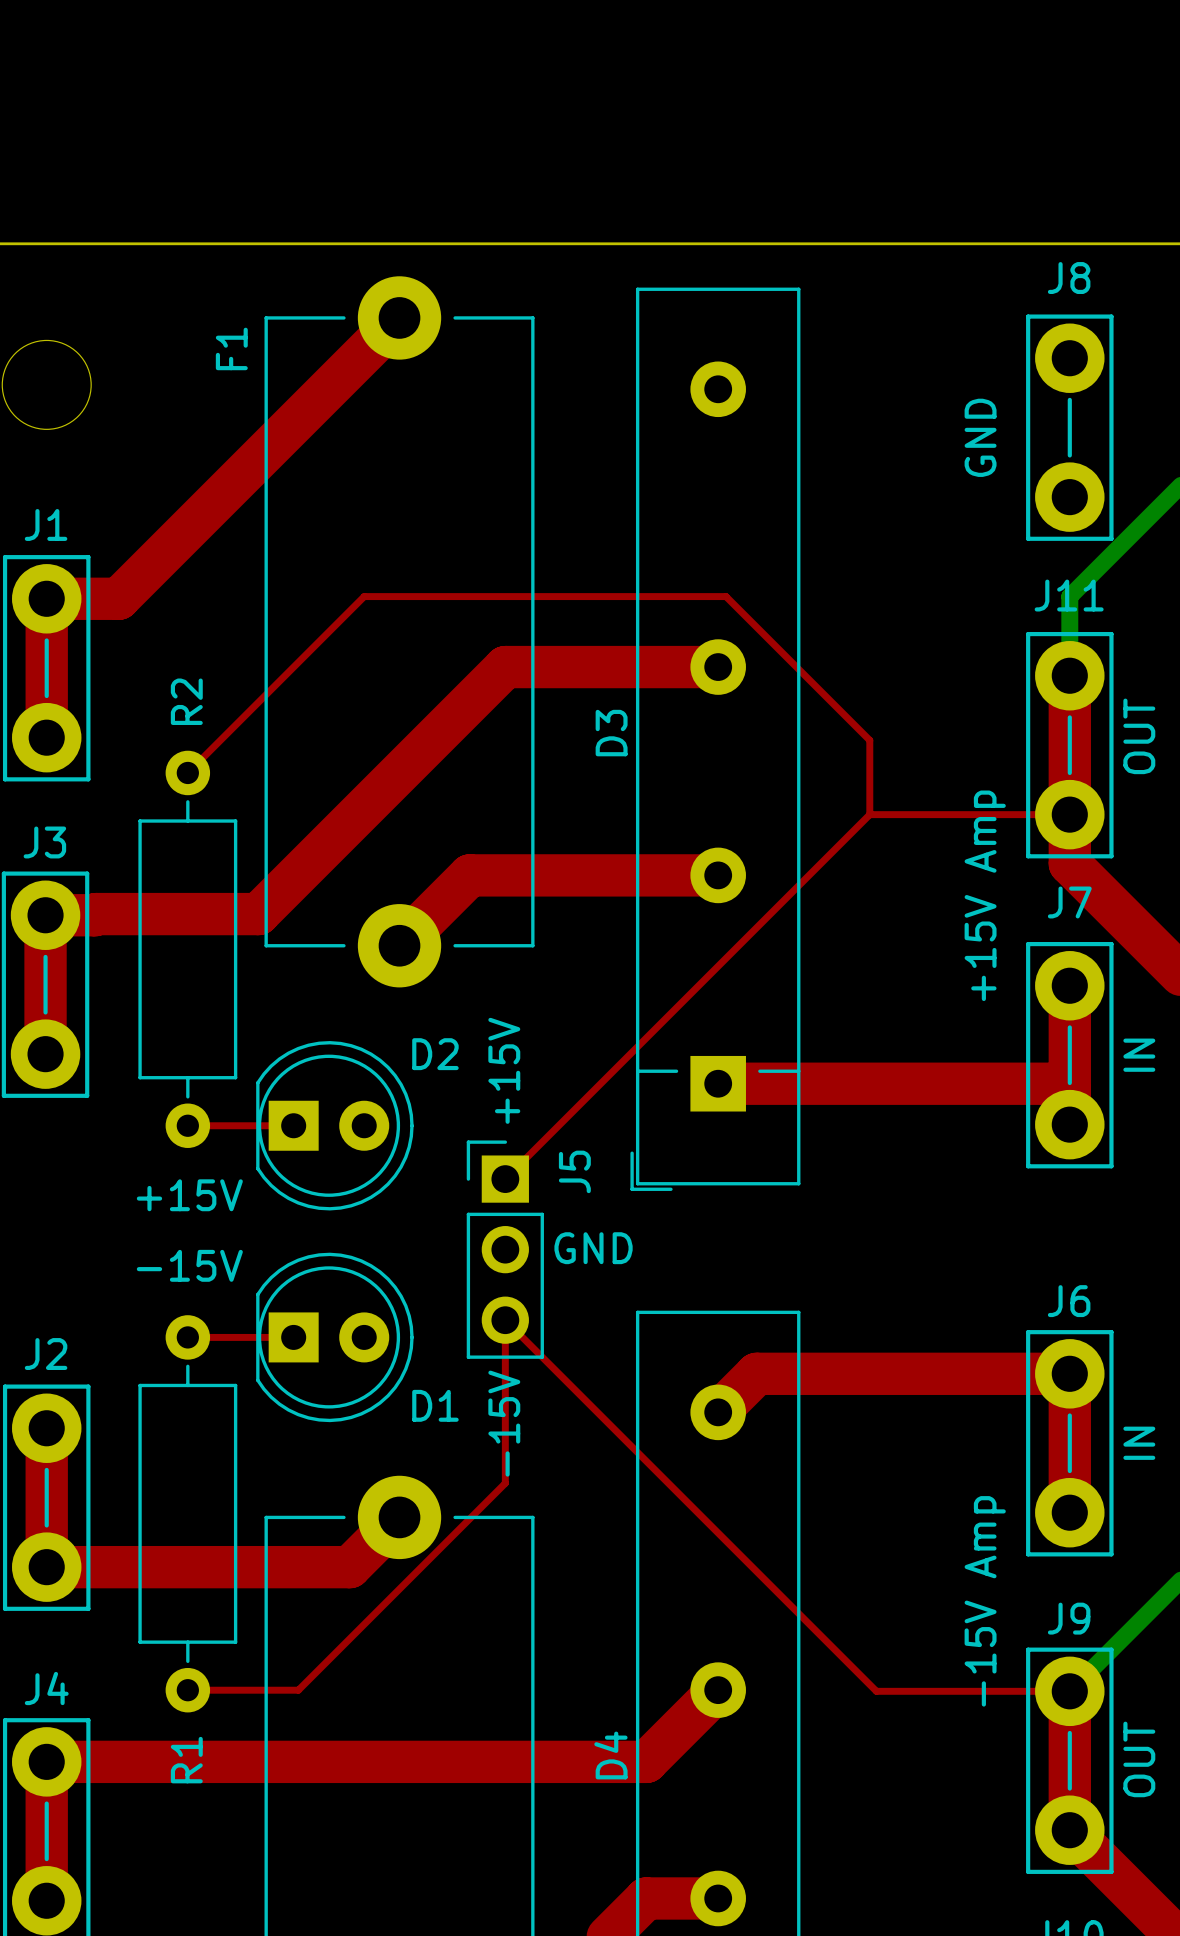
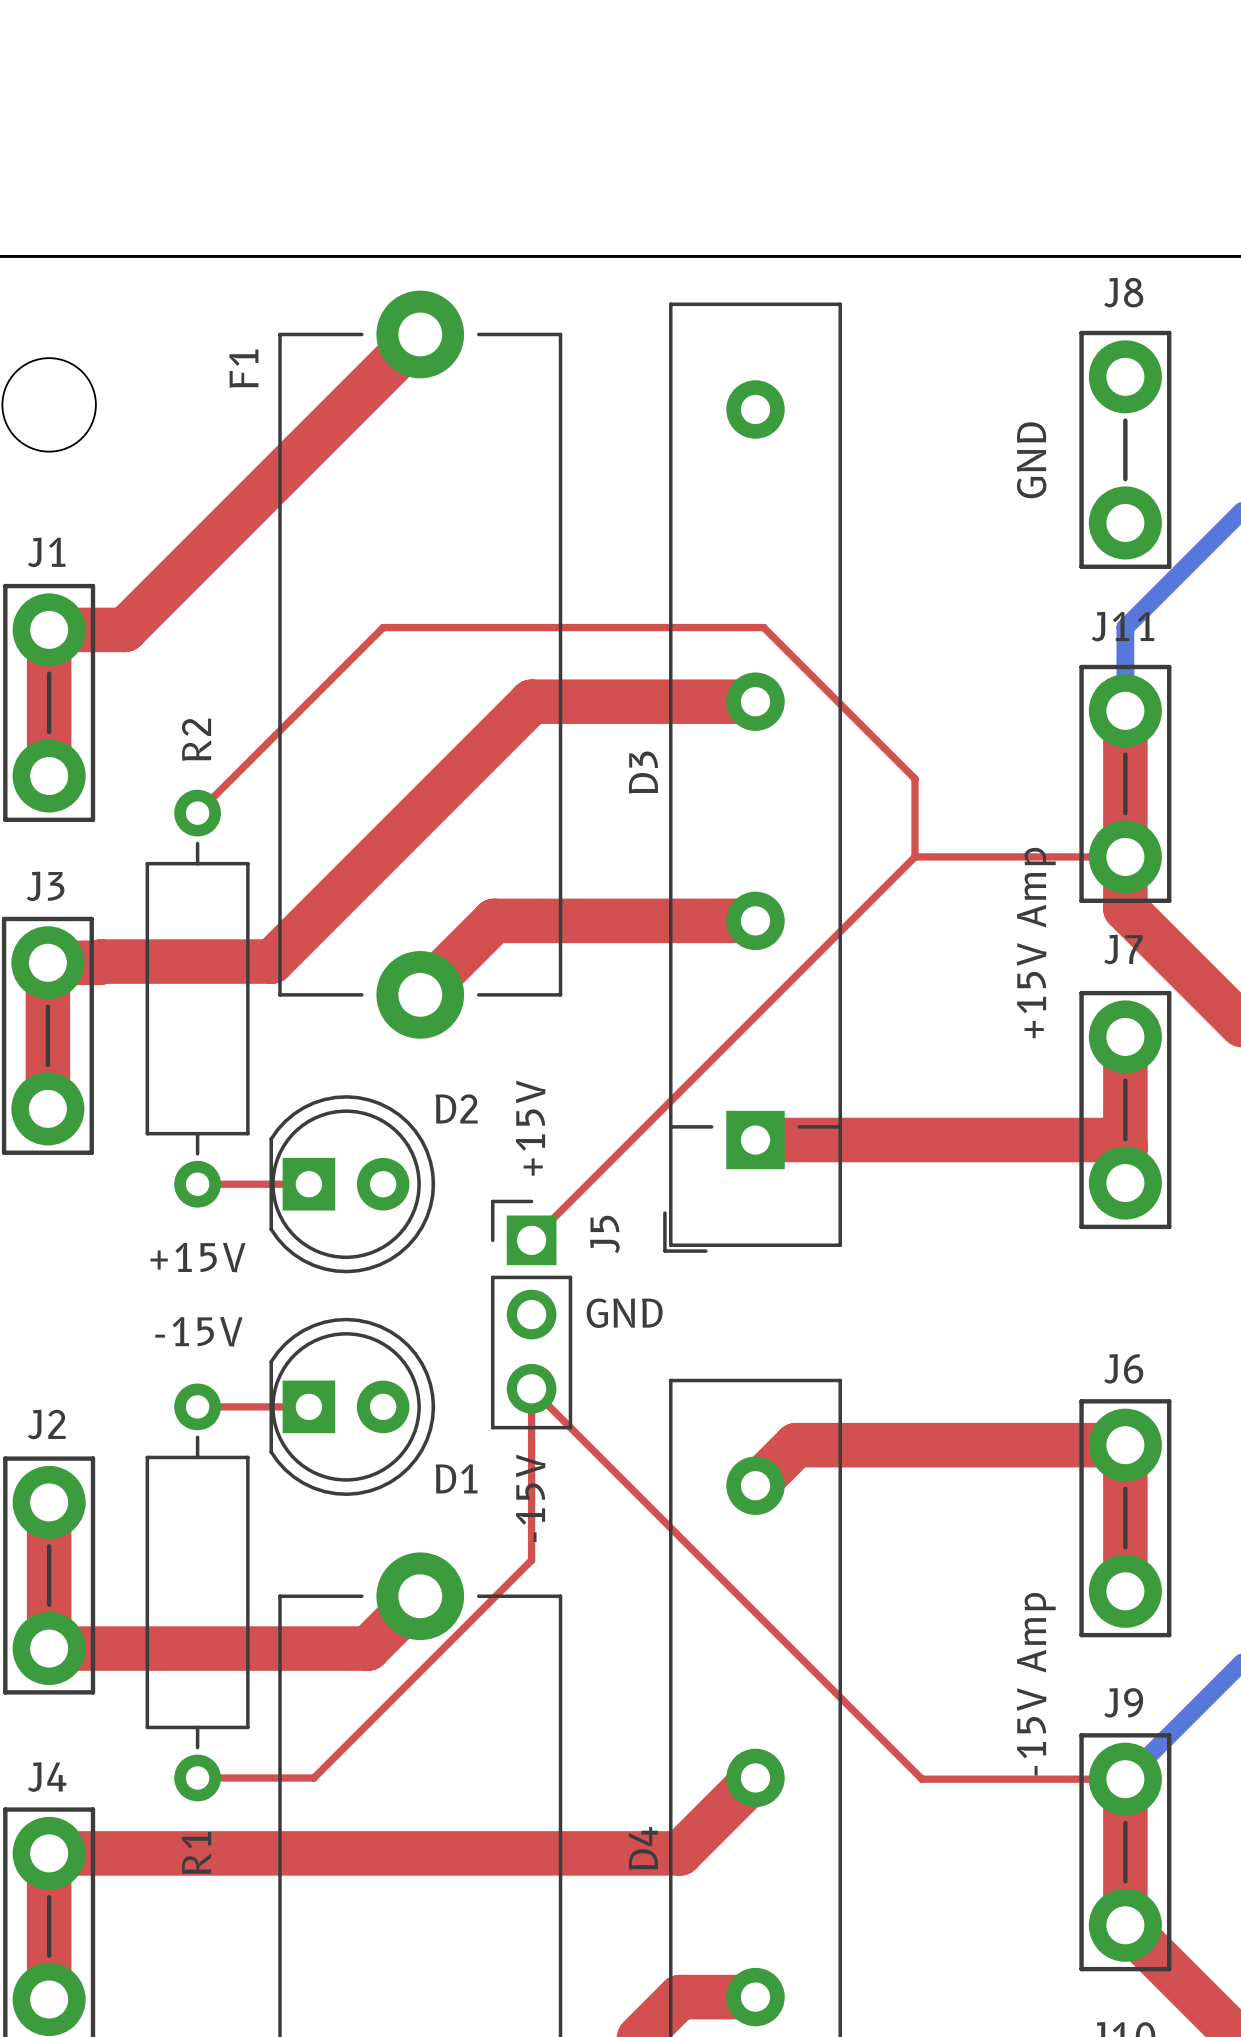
text: OUT (1139, 736) -> none
text: IN (1139, 1055) -> none
text: IN (1139, 1443) -> none
text: OUT (1139, 1759) -> none

